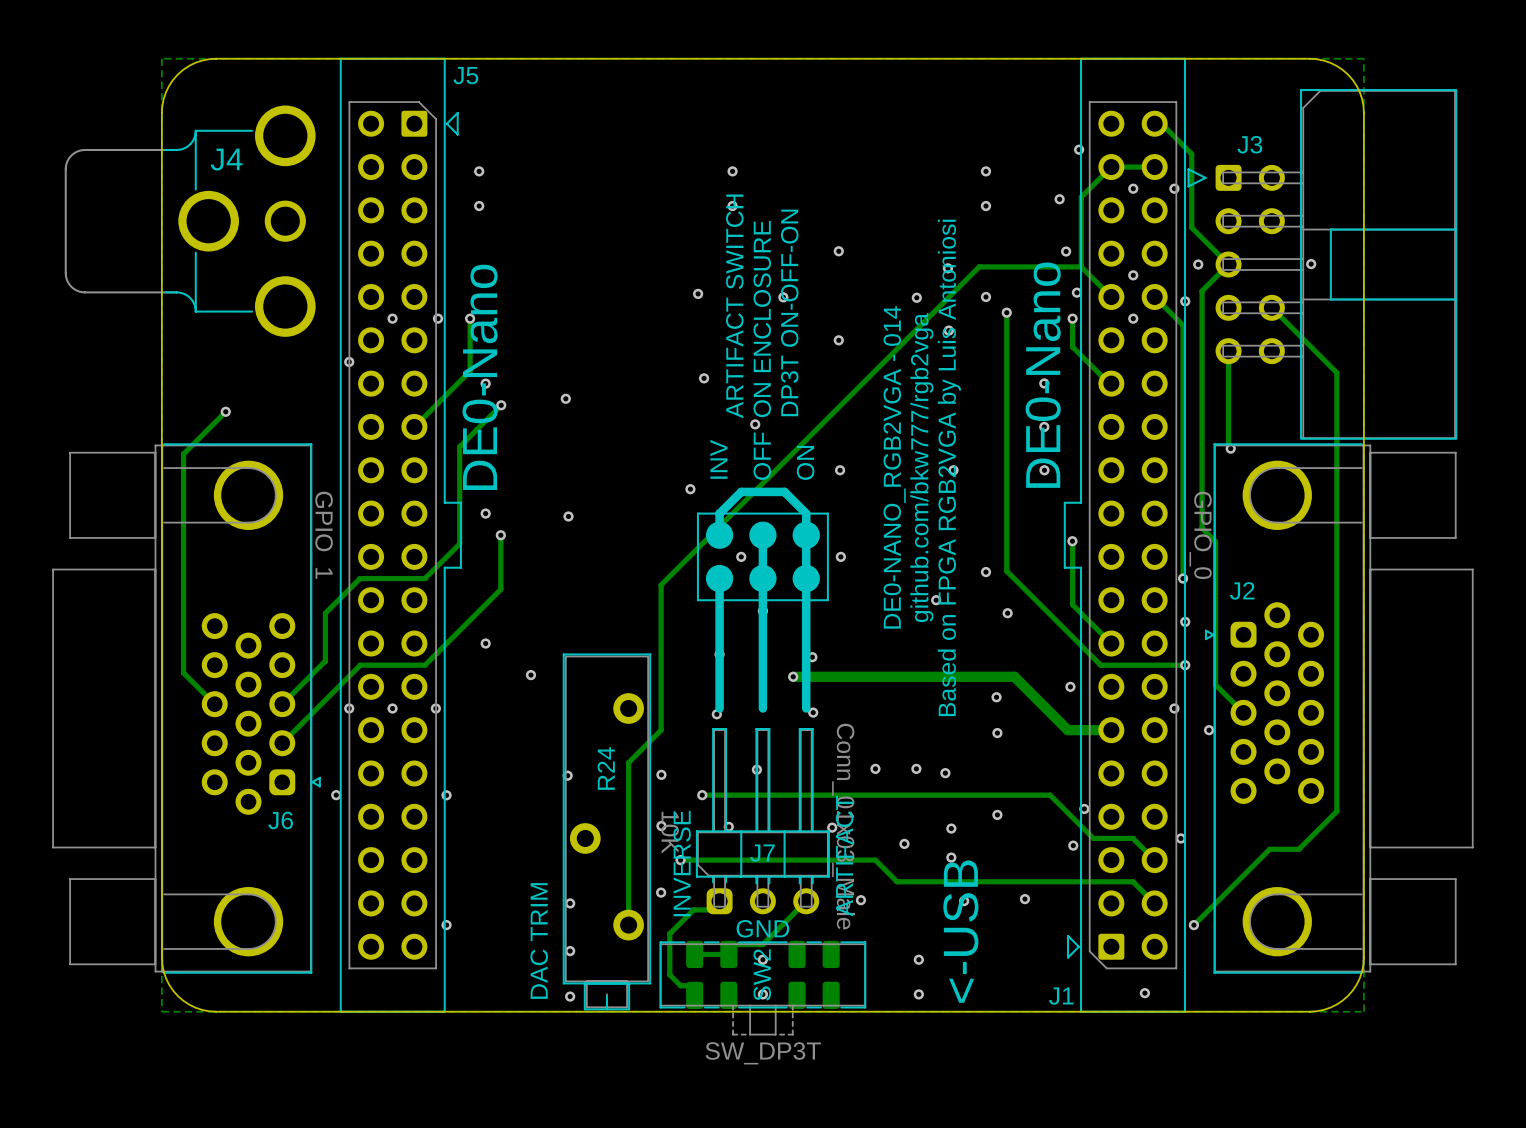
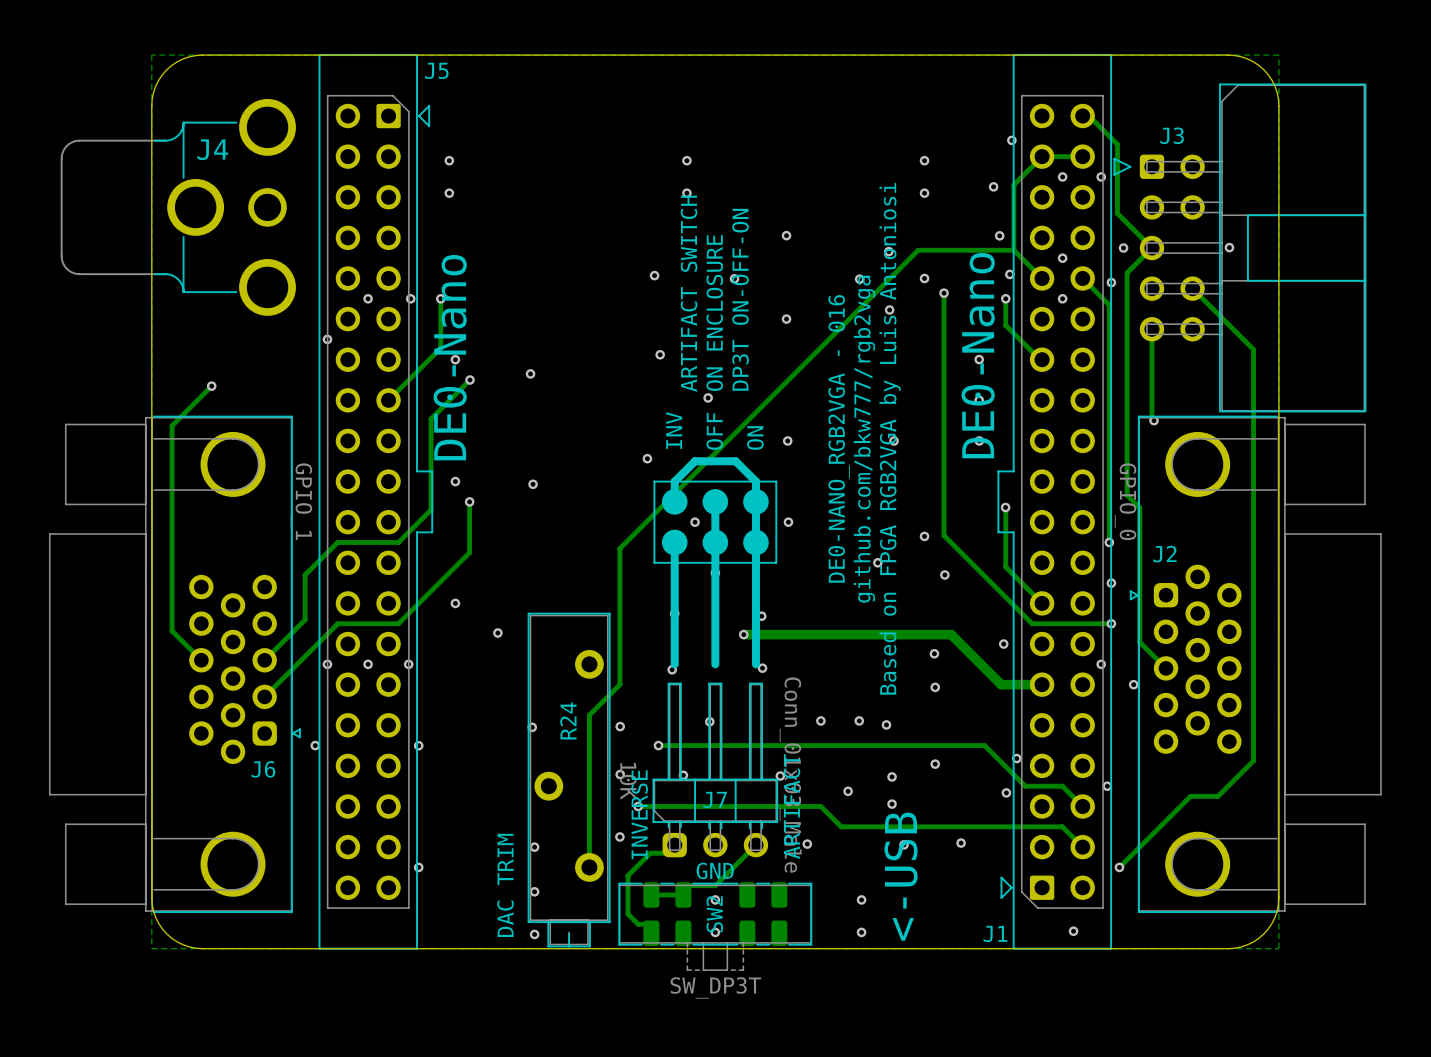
text: DE0-NANO_RGB2VGA - 014 (894, 467) -> DE0-NANO_RGB2VGA - 016 (839, 438)

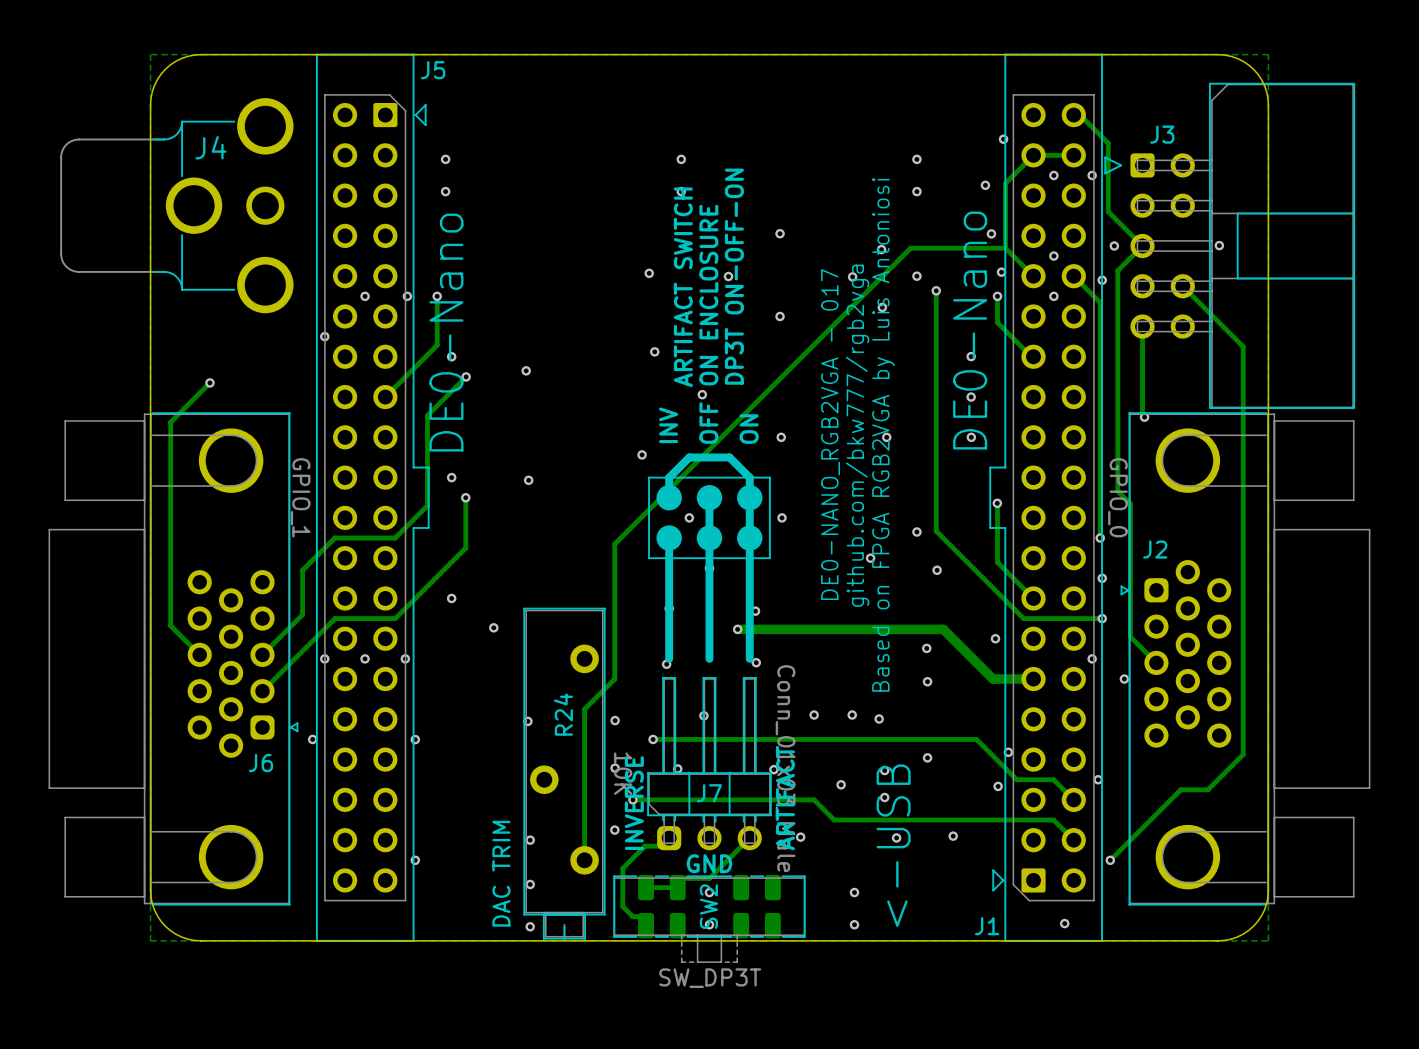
text: DE0-NANO_RGB2VGA - 016 (839, 438) -> DE0-NANO_RGB2VGA - 017 (830, 434)

